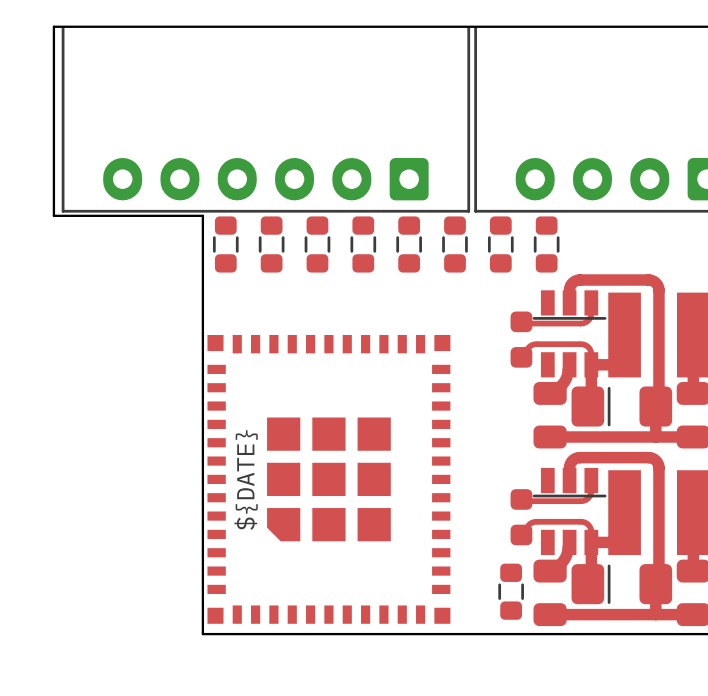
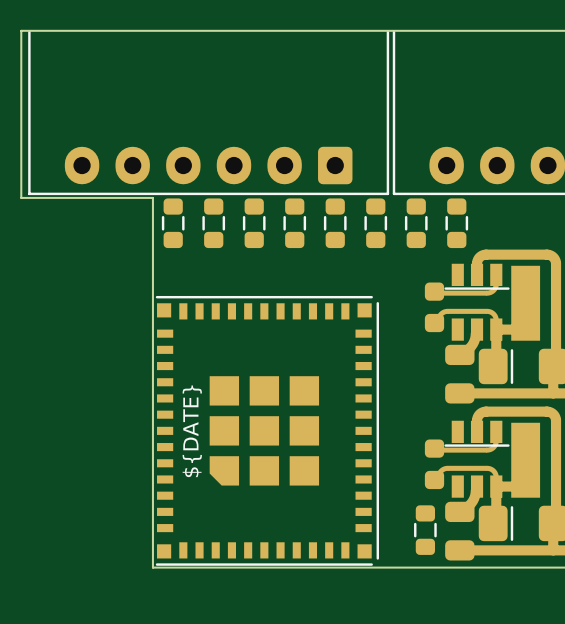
part footprint: [207, 335, 451, 624] -> [155, 295, 380, 566]

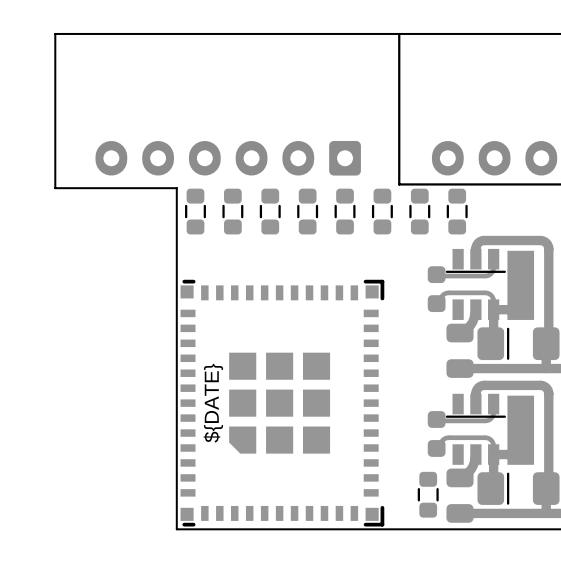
part: (208, 112) -> none
part footprint: [155, 295, 380, 566] -> [180, 279, 385, 527]

